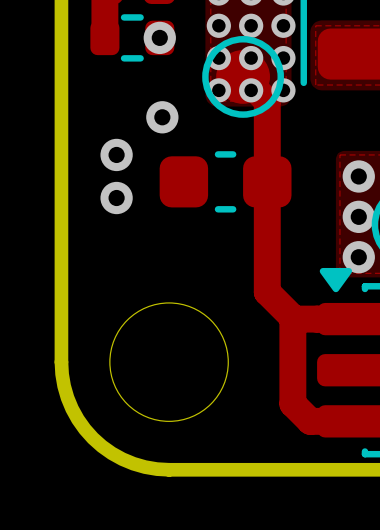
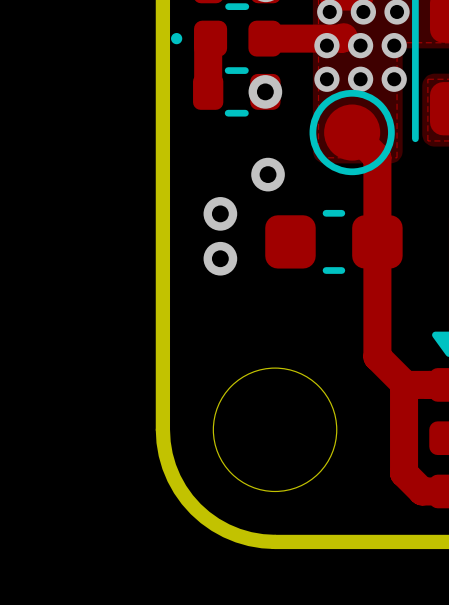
via: (218, 58) -> none
via: (251, 58) -> none
via: (283, 58) -> none
via: (218, 90) -> none
via: (251, 90) -> none
via: (283, 90) -> none

